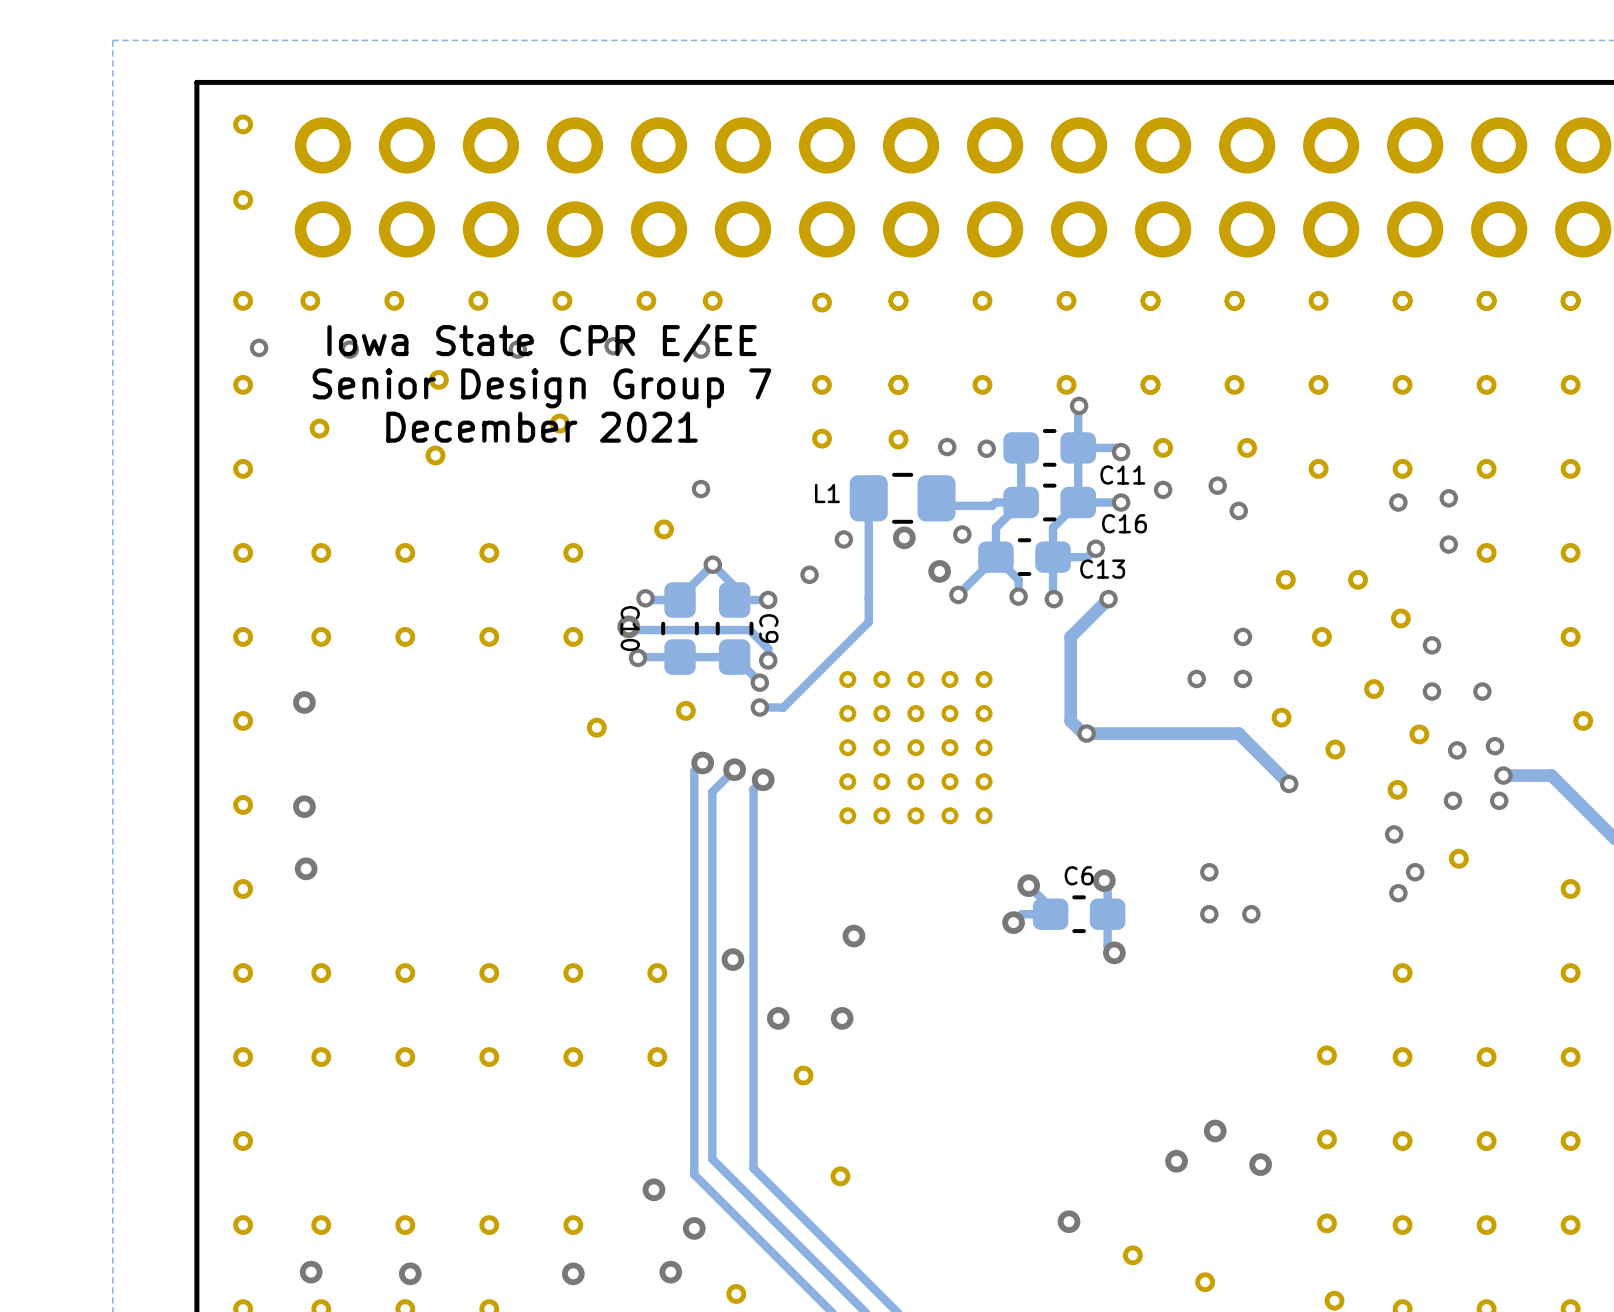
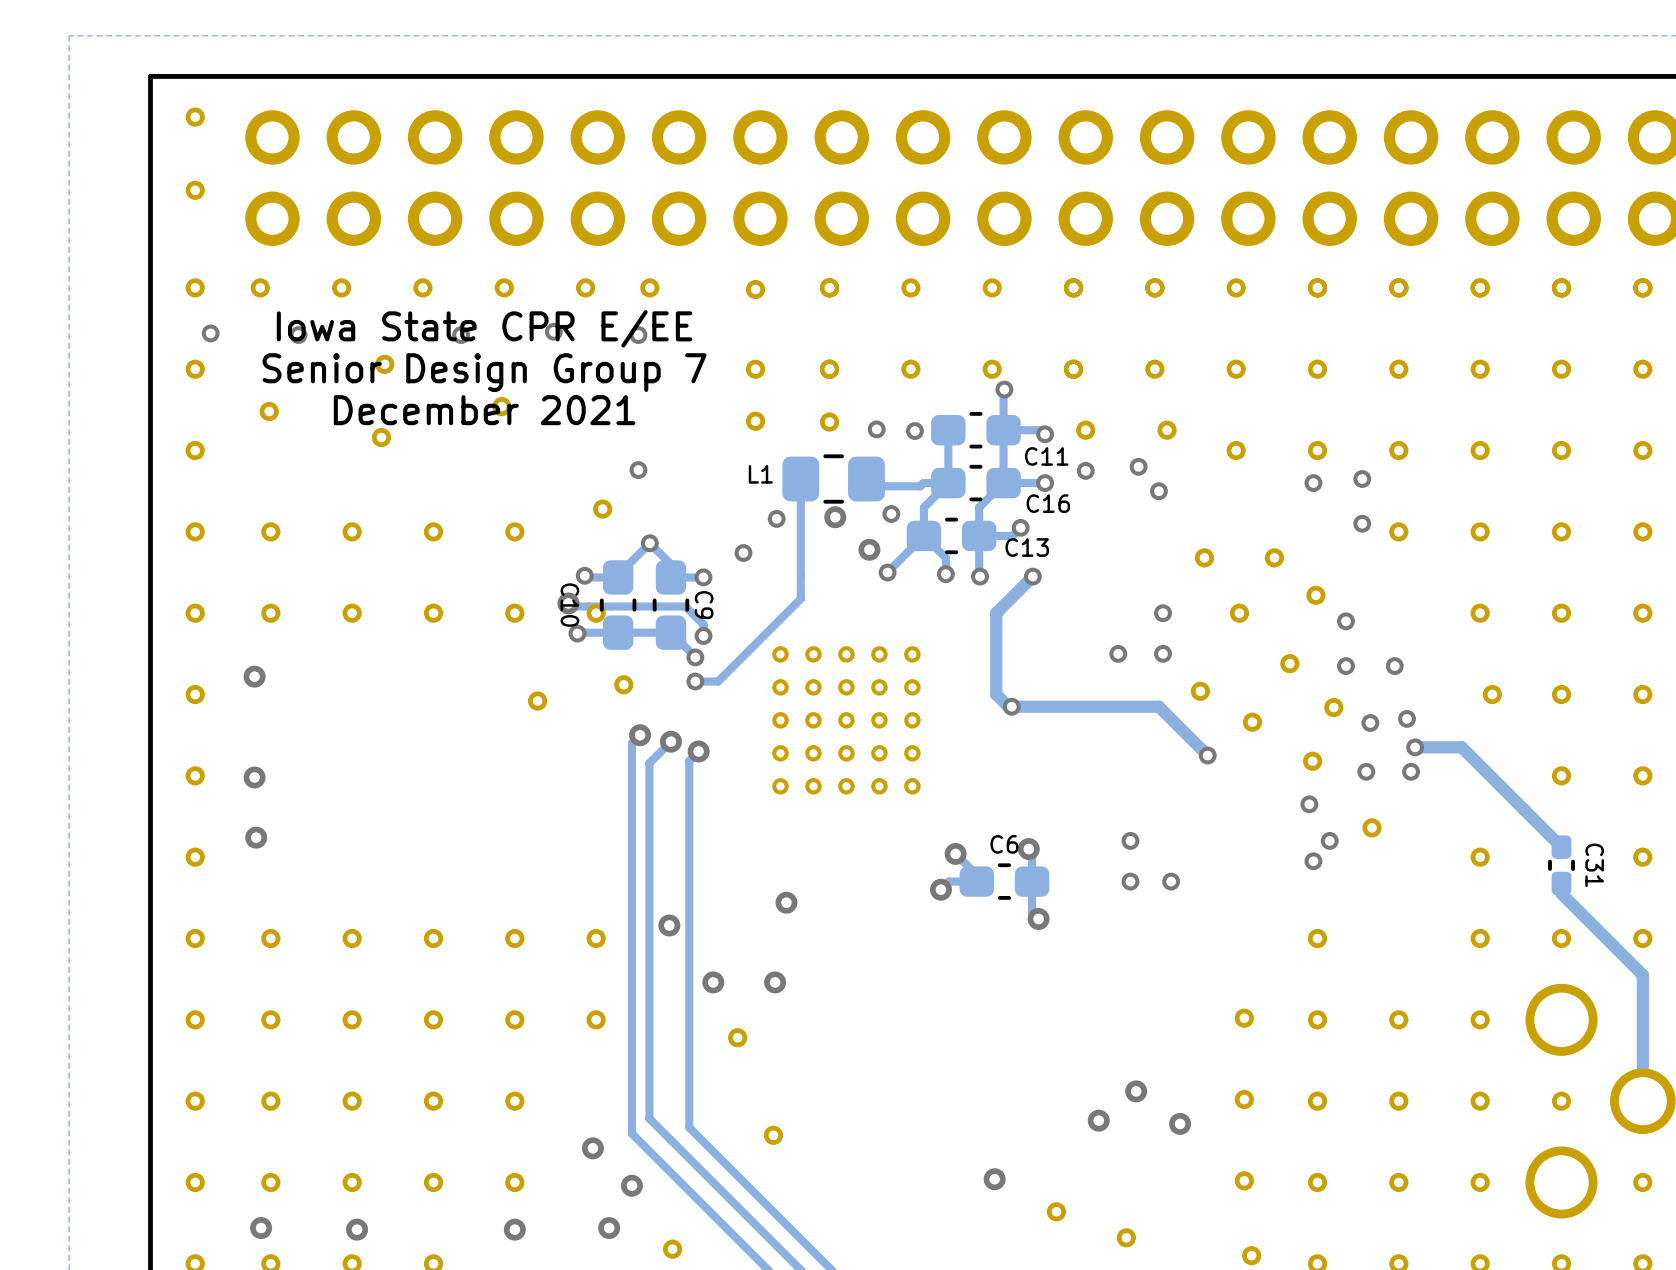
part: none -> (596, 613)
part: none -> (270, 1101)
part: none -> (352, 1101)
part: none -> (433, 1101)
part: none -> (514, 1101)

